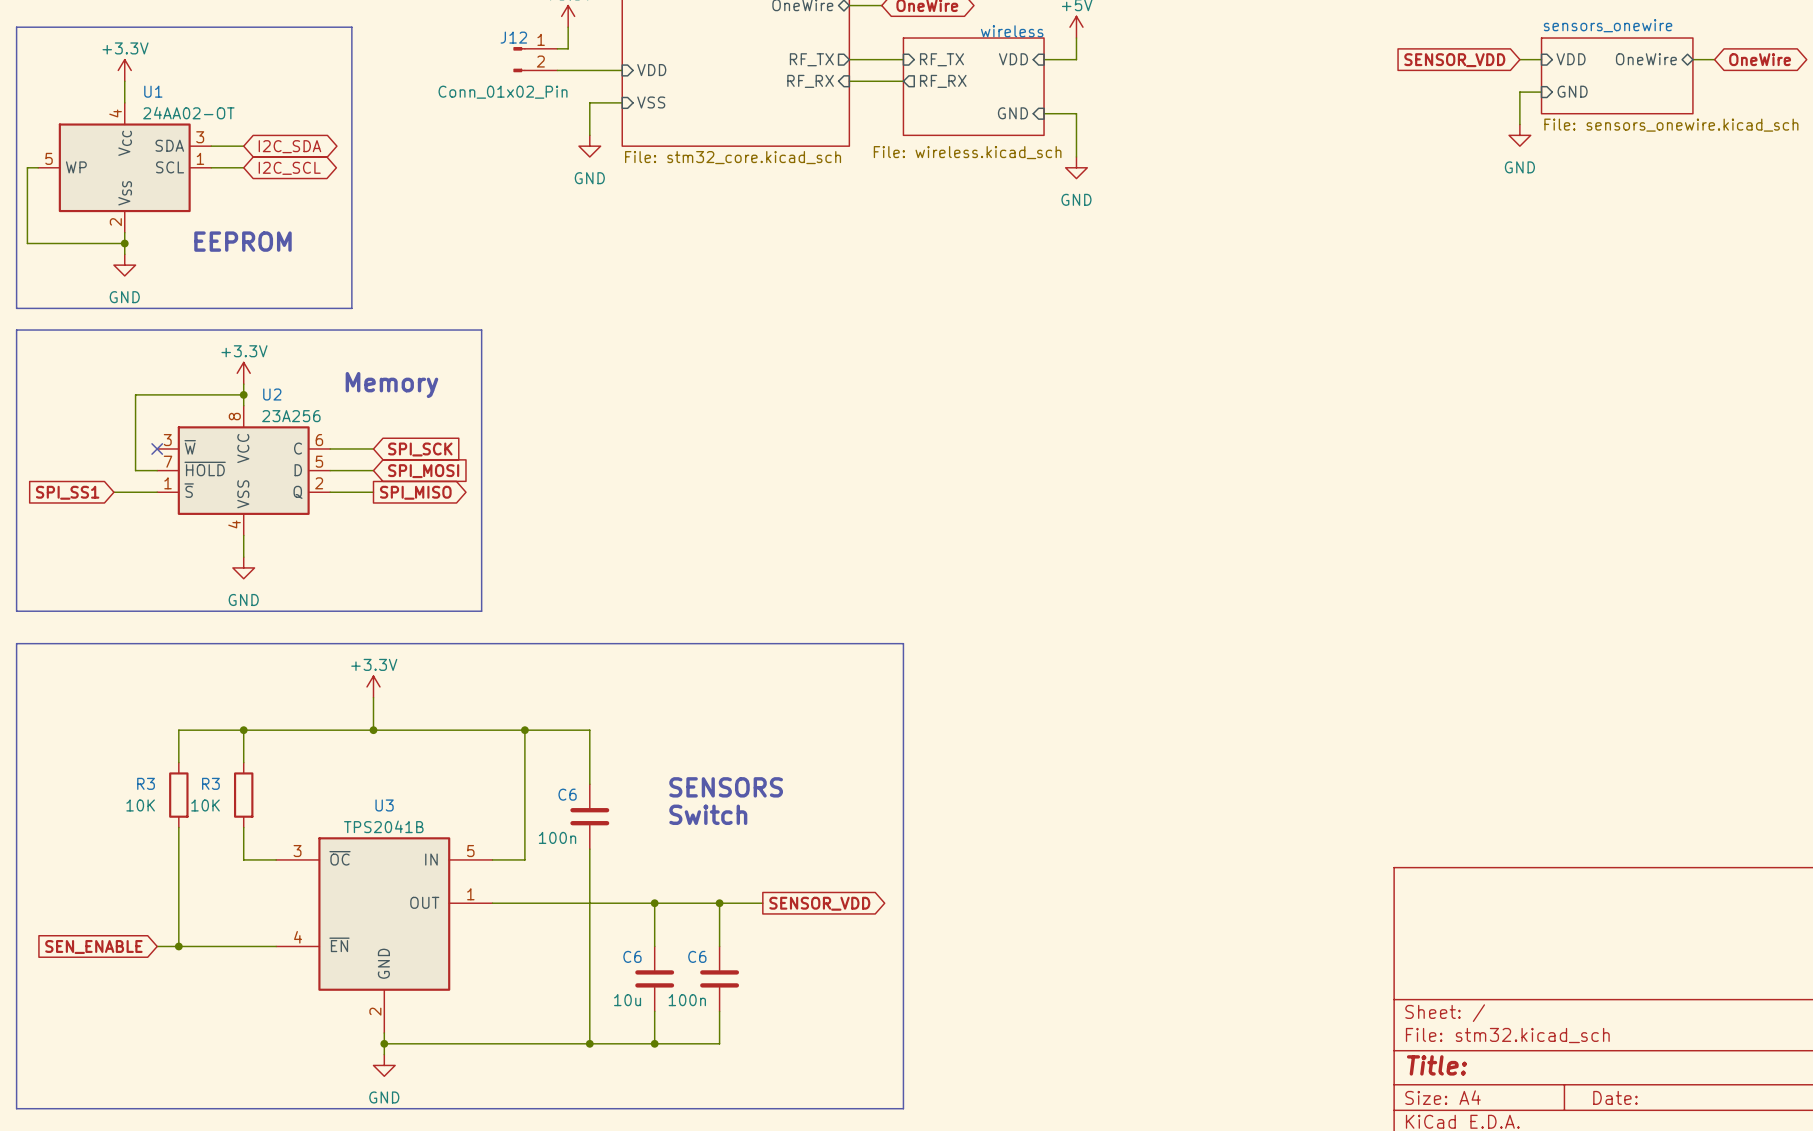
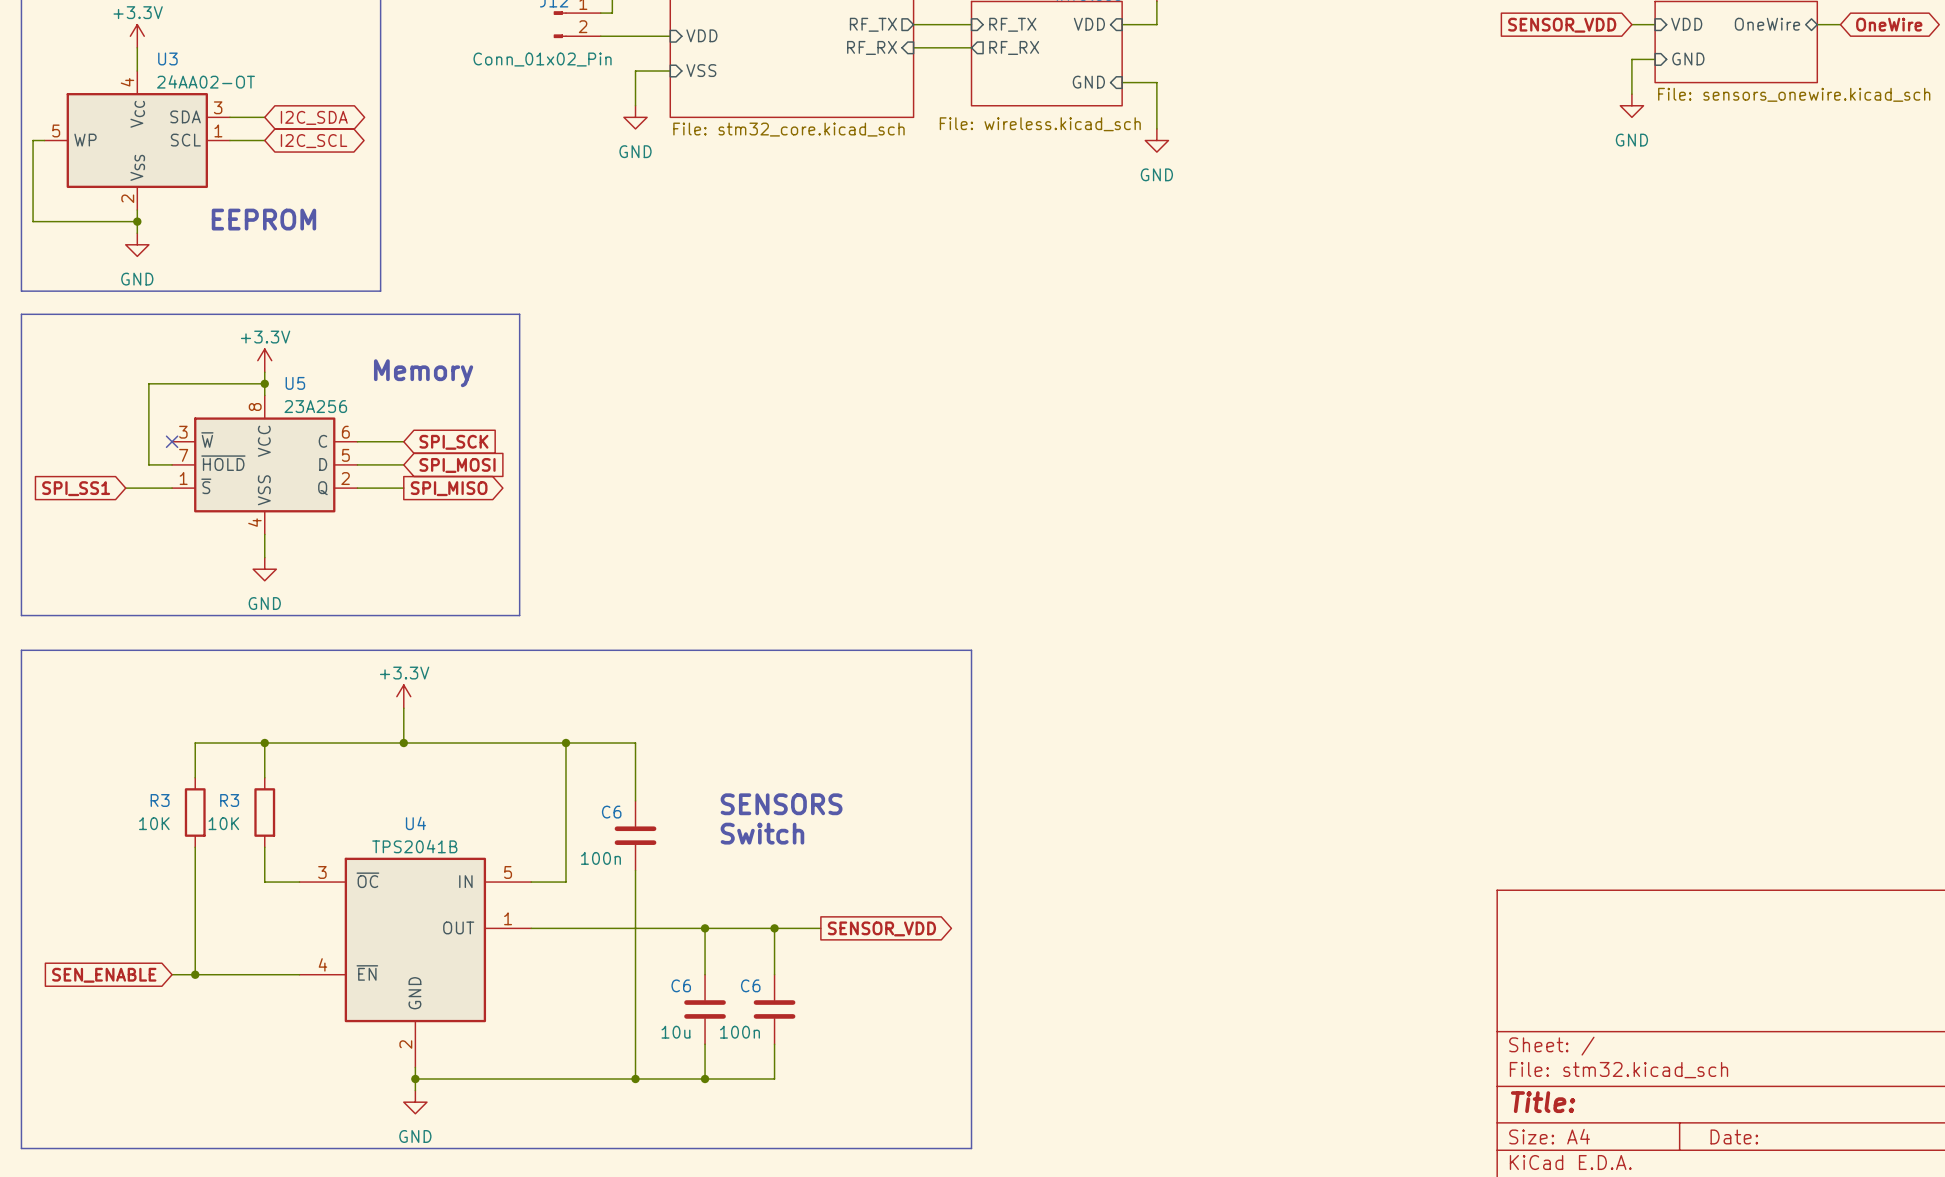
U1 name: U1 (153, 91) -> U3 (167, 58)
U2 name: U2 (272, 394) -> U5 (295, 383)
U3 name: U3 (384, 805) -> U4 (415, 823)

